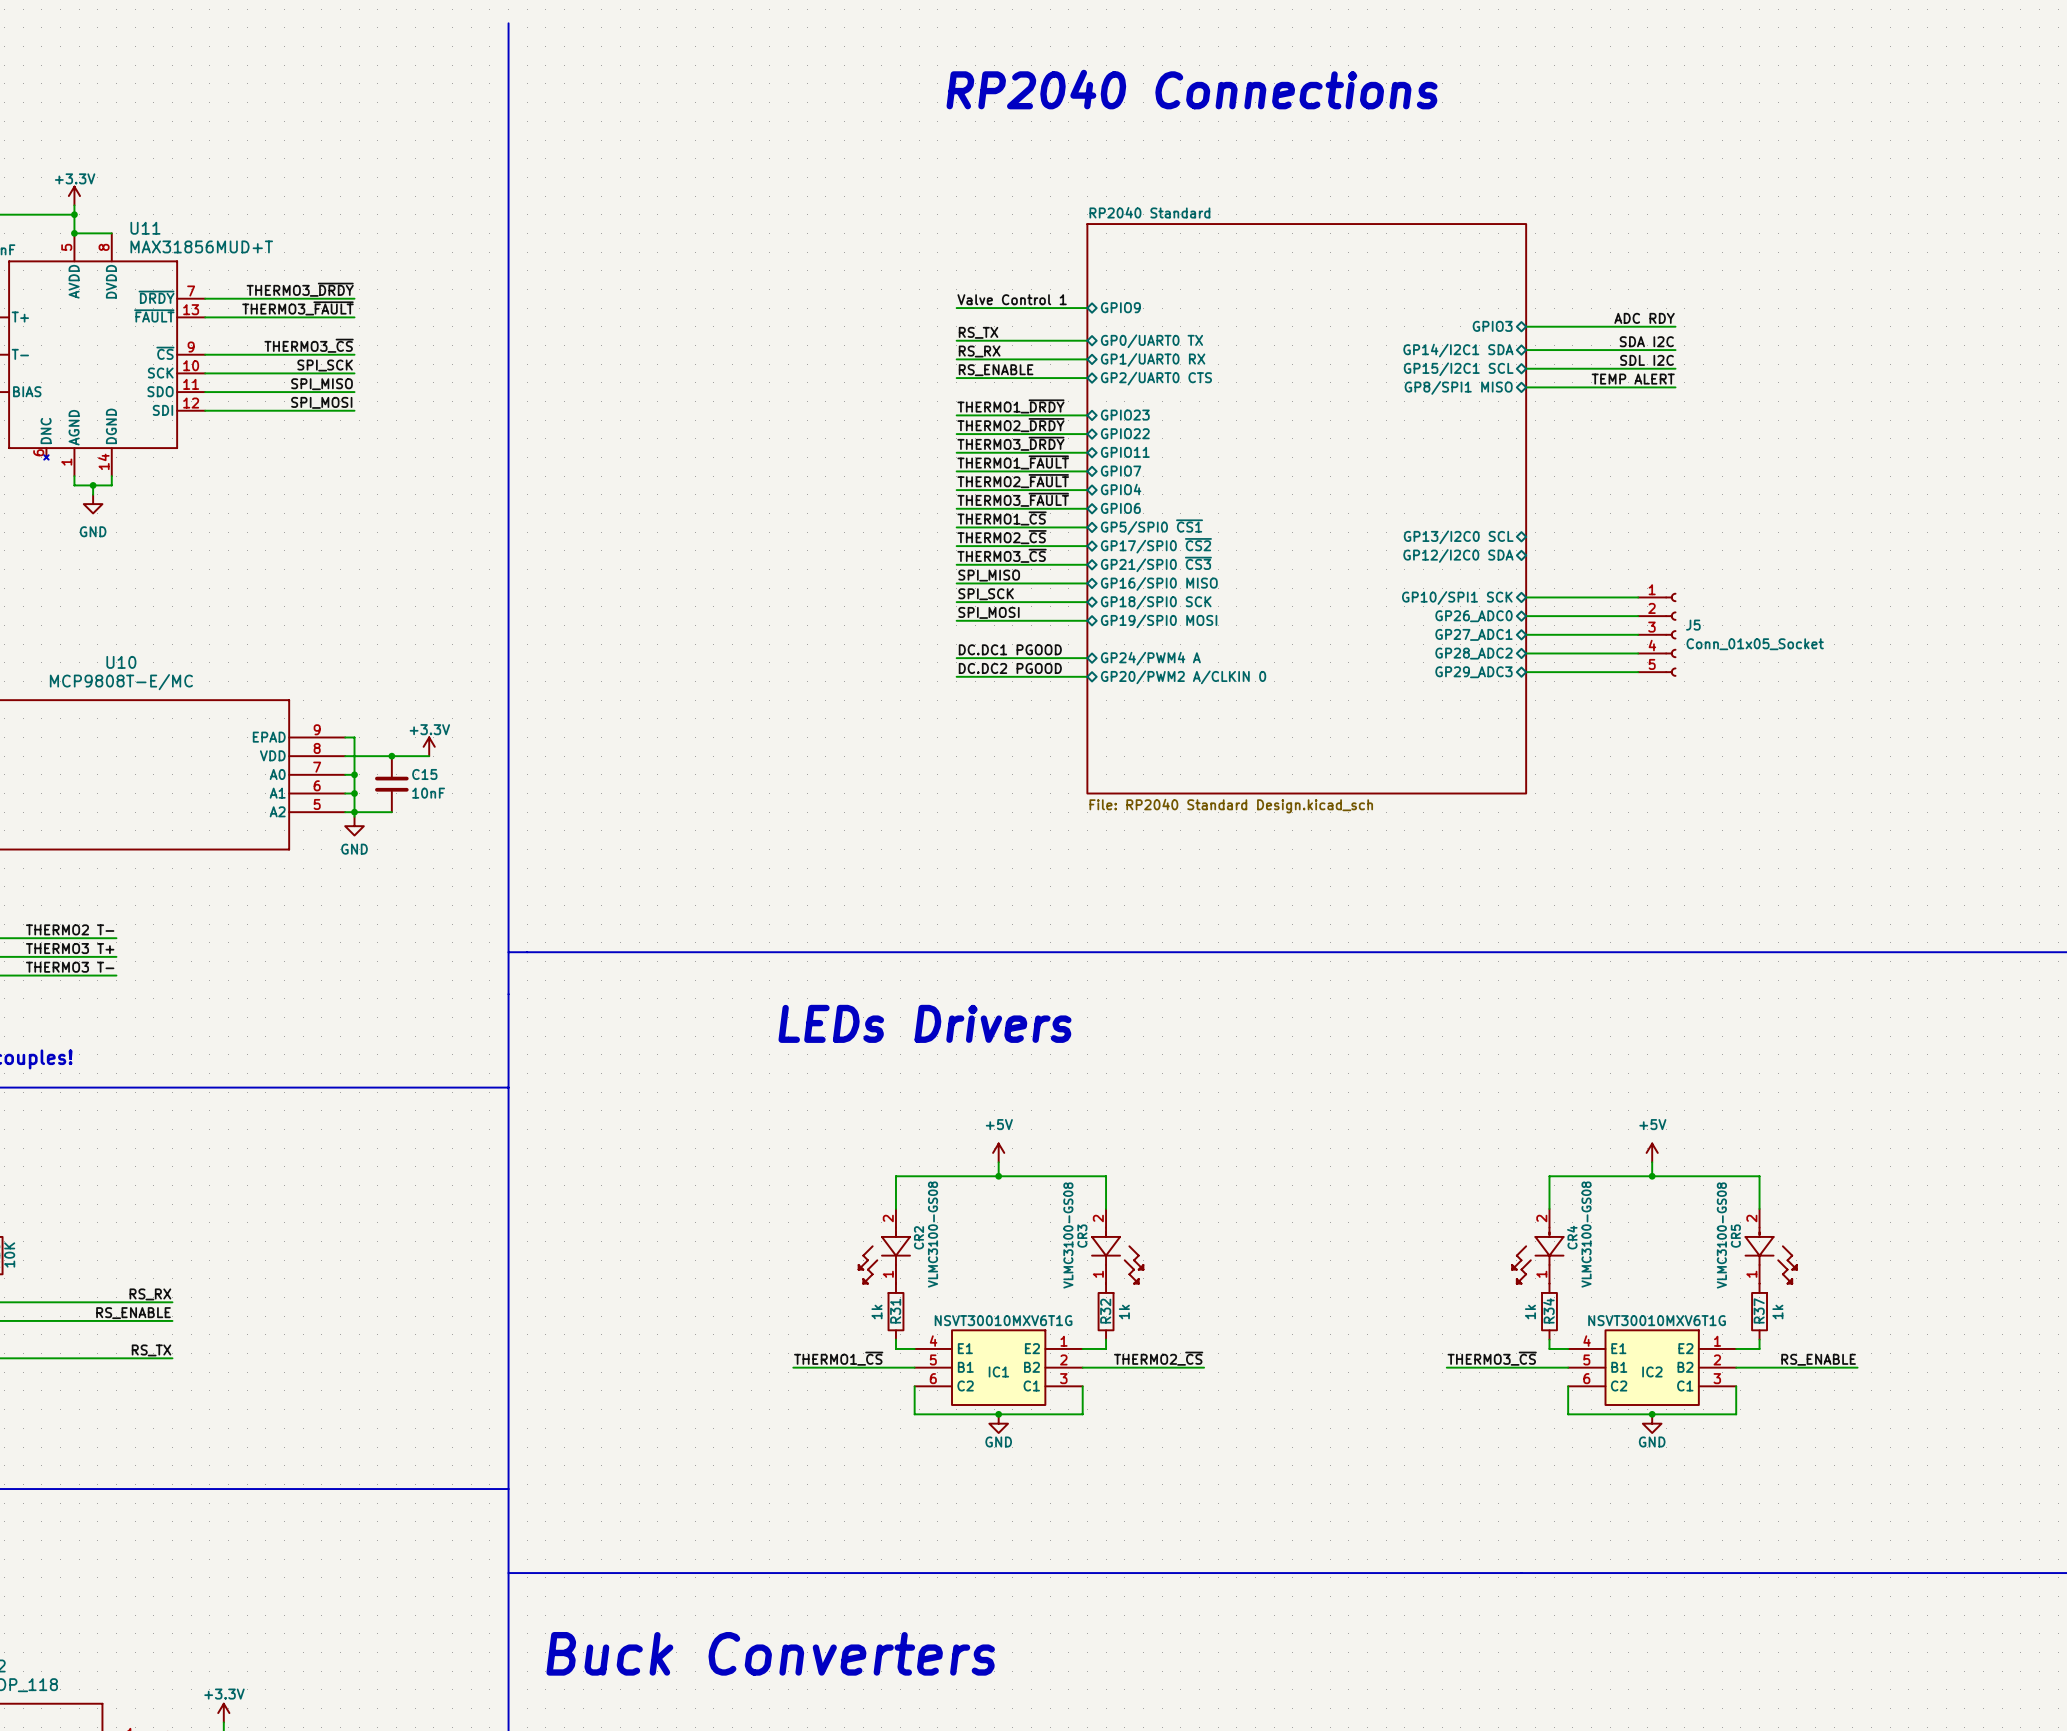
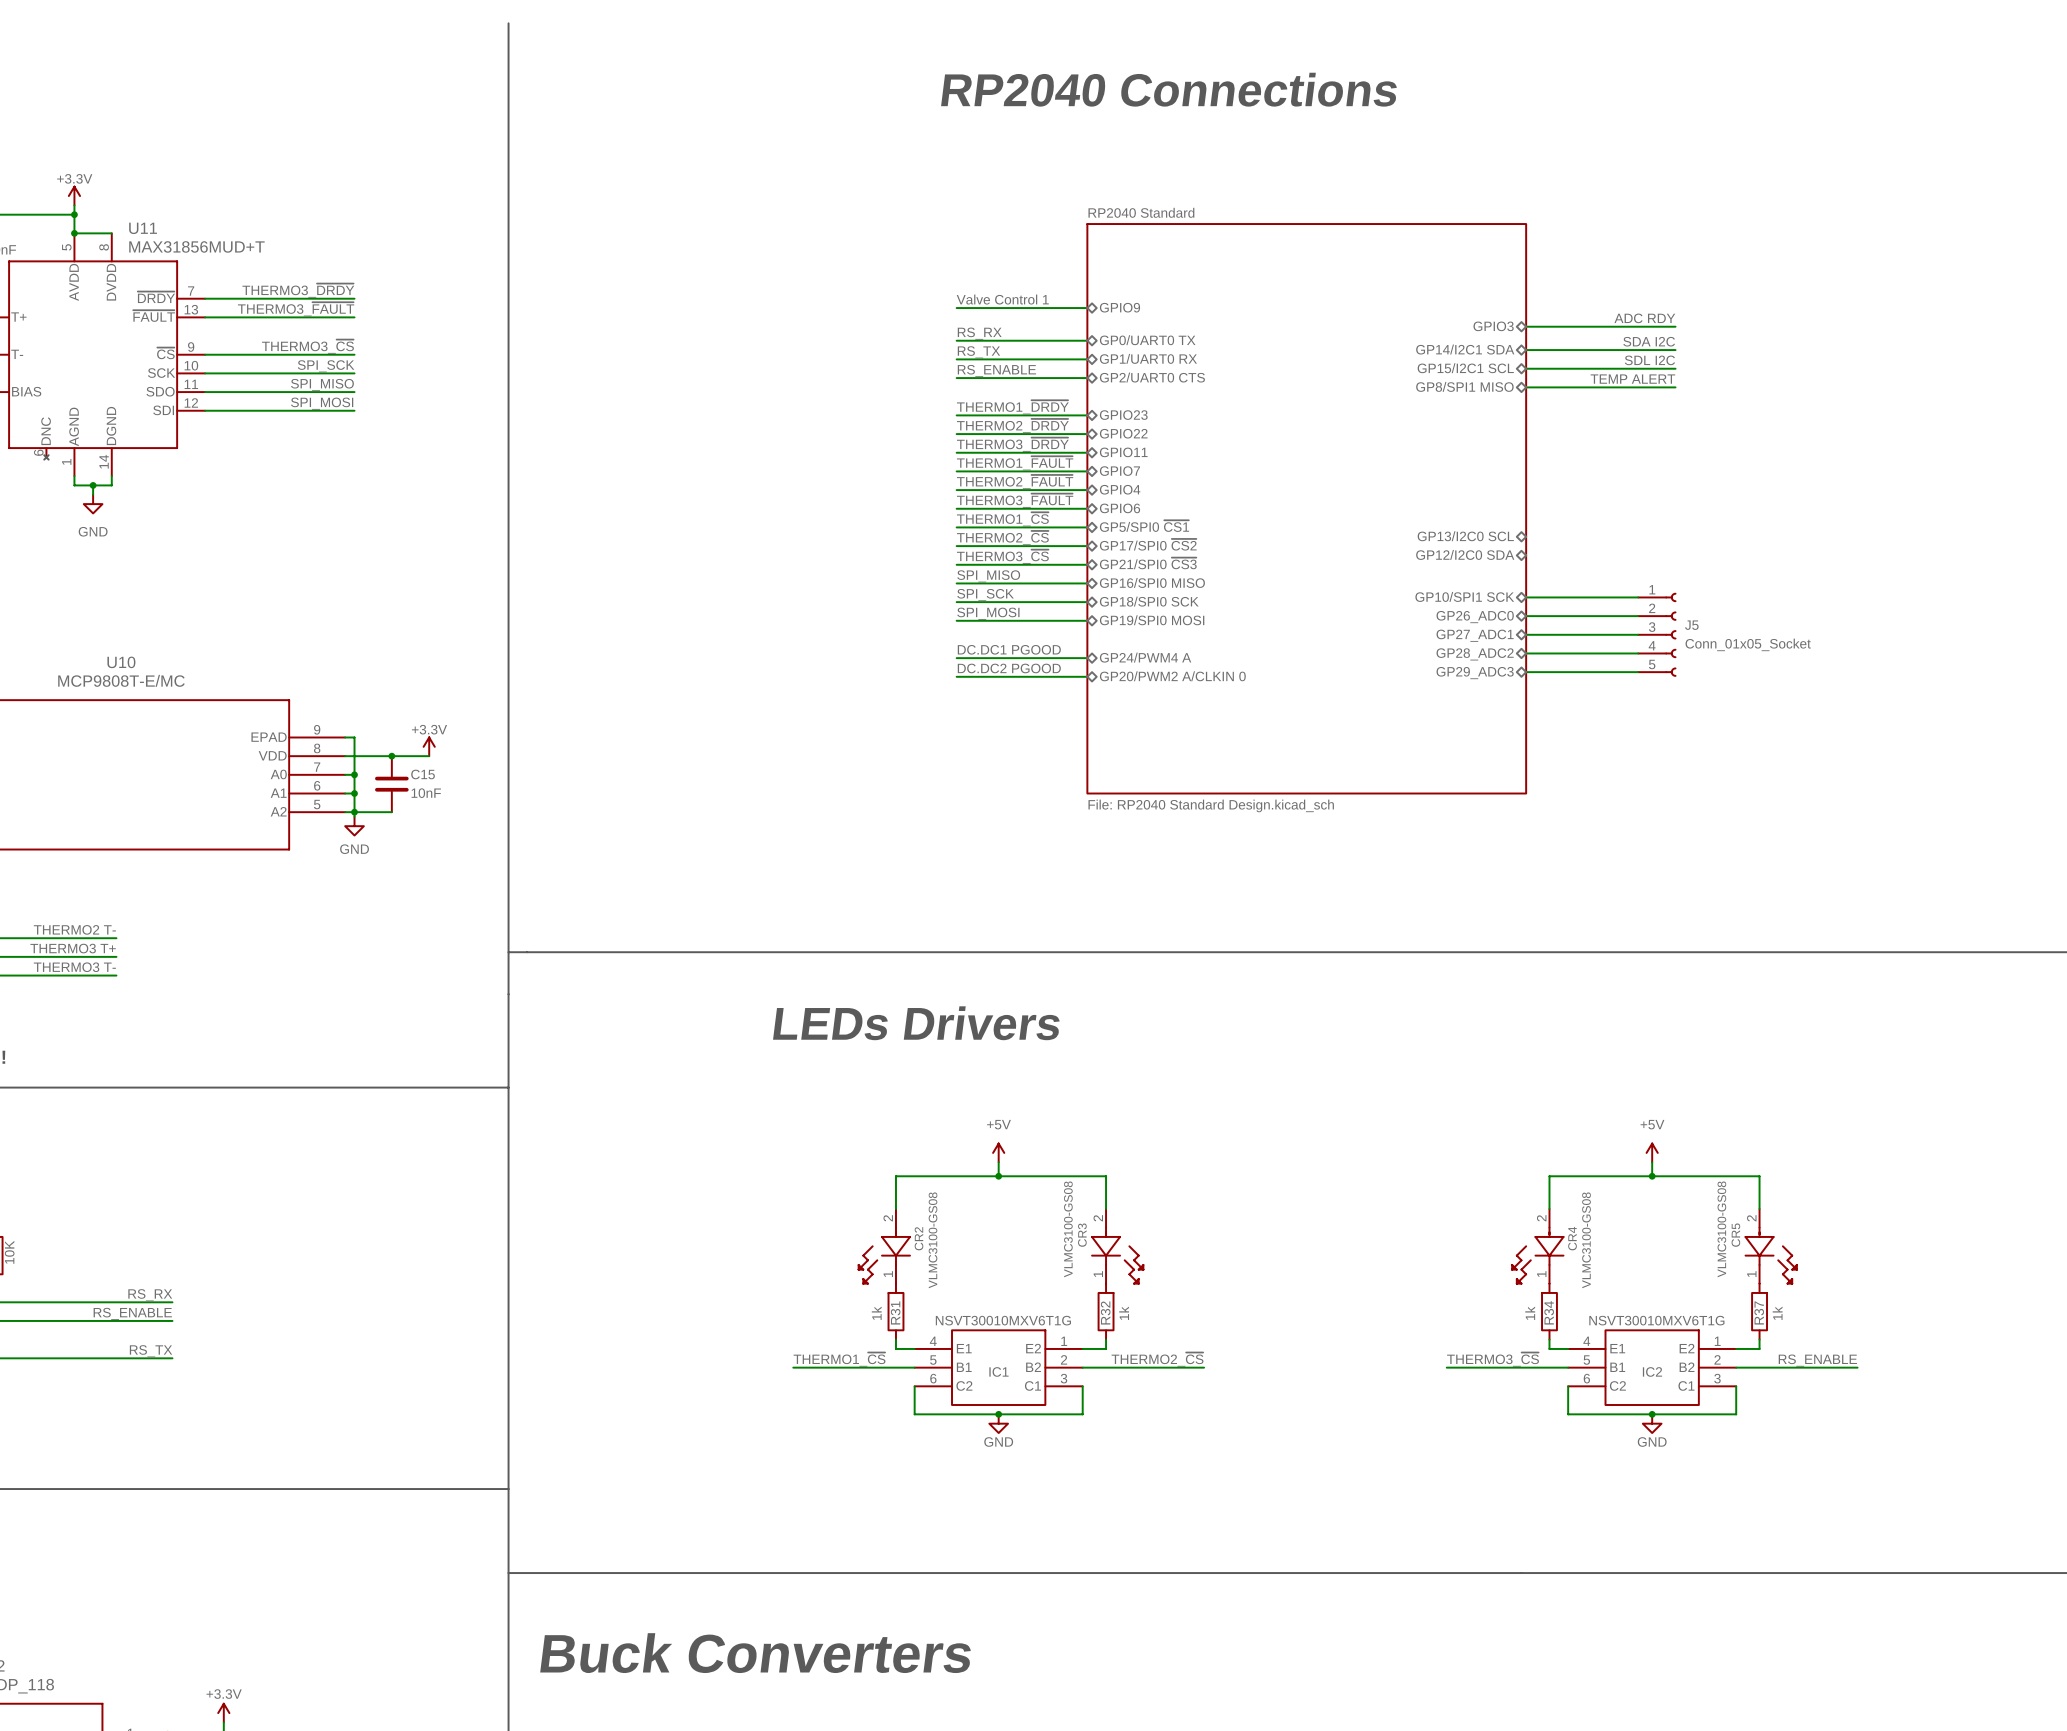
label: RS_TX (978, 332) -> RS_RX (979, 333)
label: RS_RX (979, 351) -> RS_TX (978, 352)

